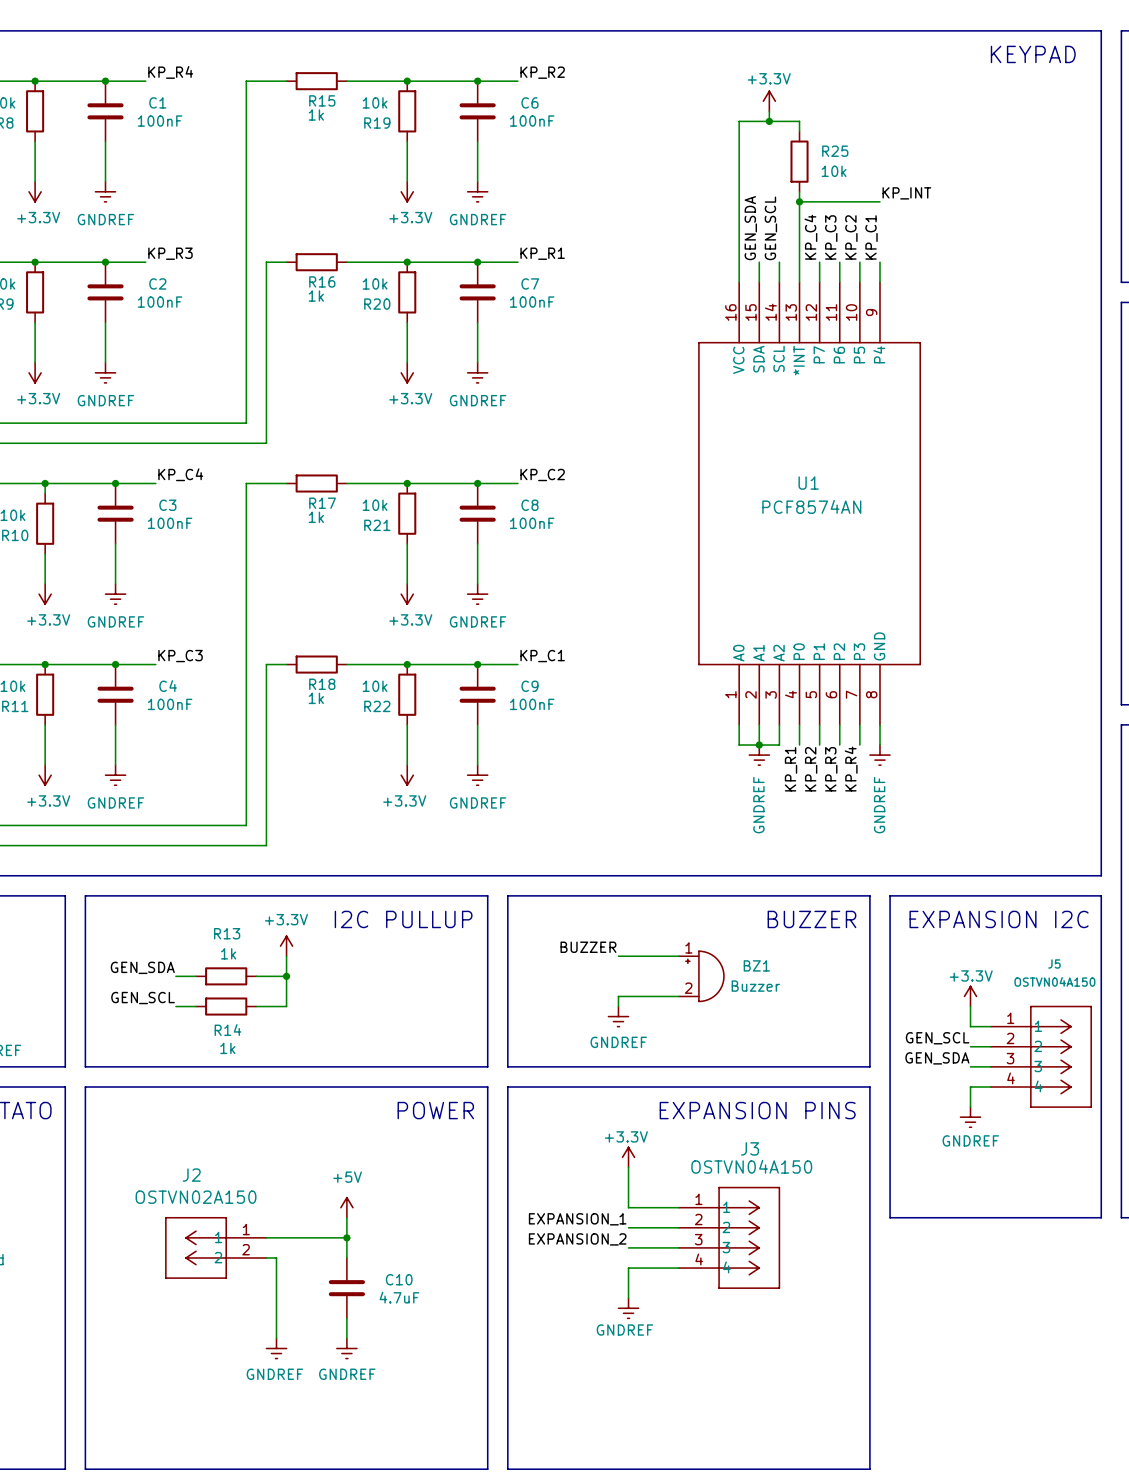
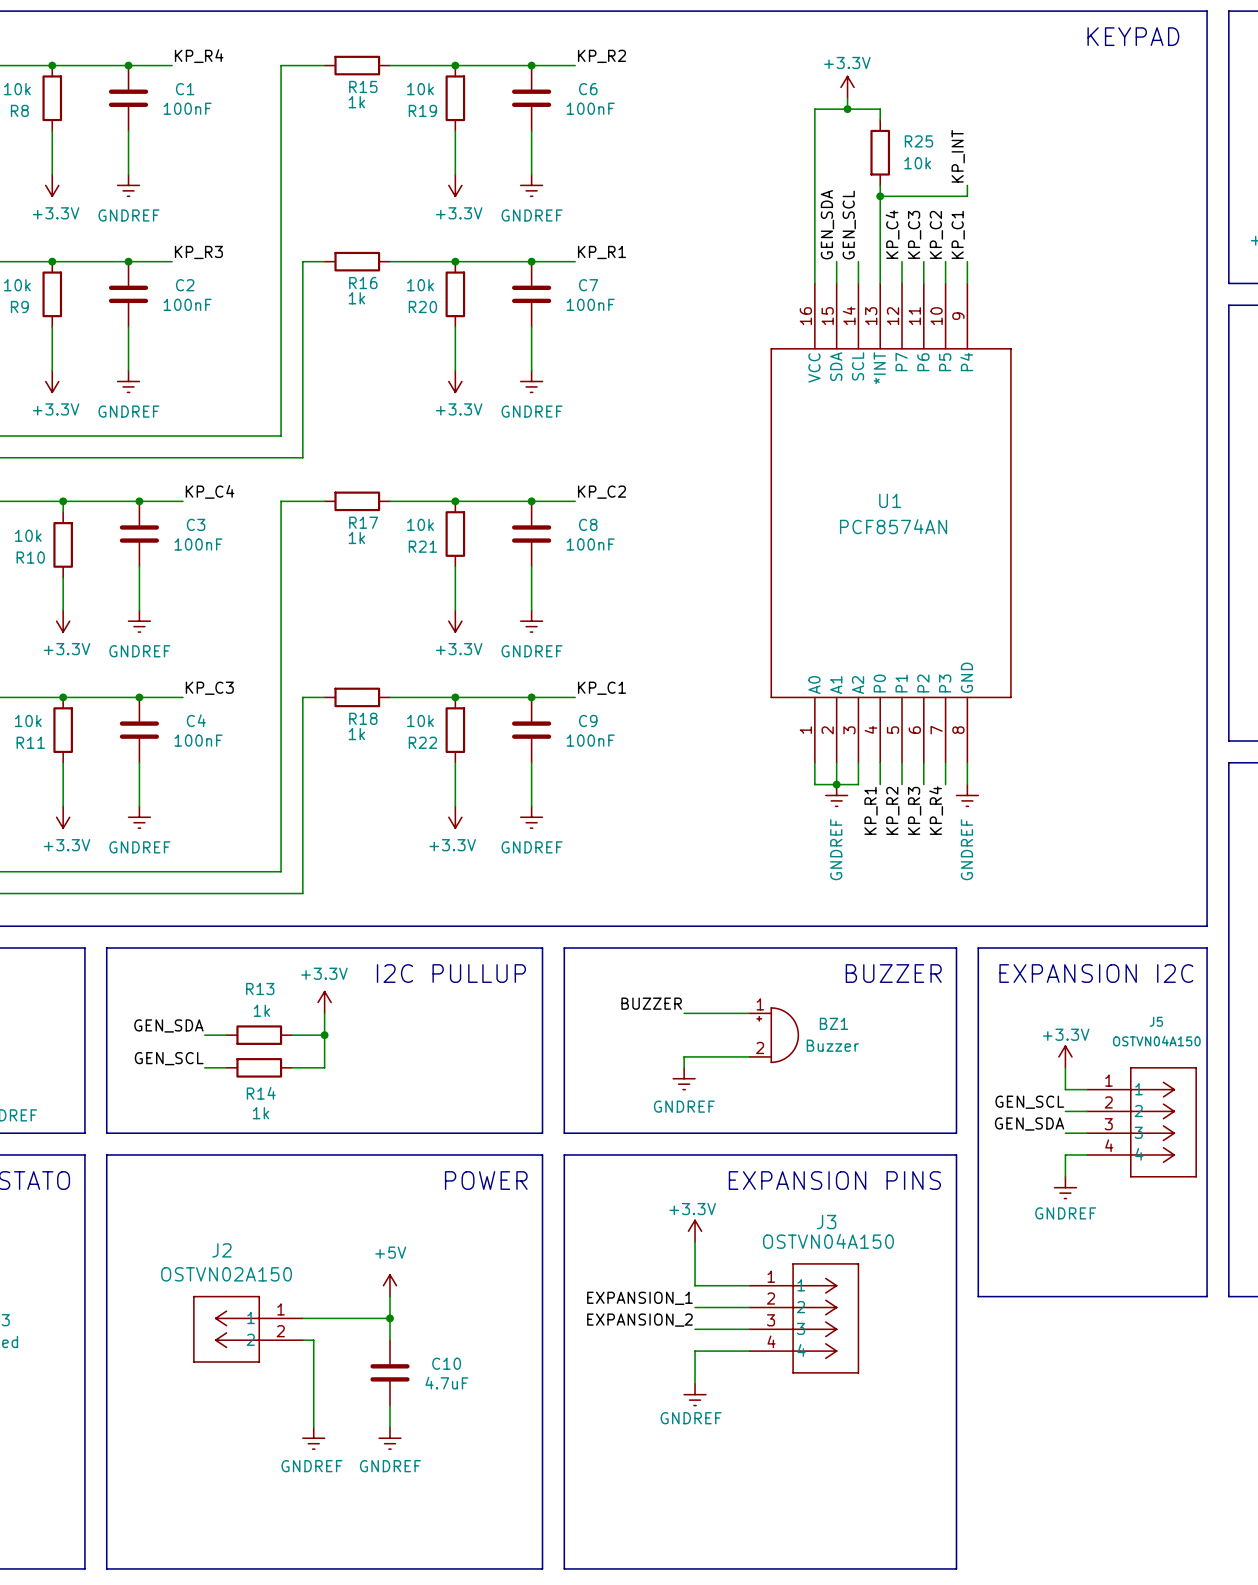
wire: none -> (967, 185) (967, 196)
label rotation: 0° (906, 193) -> 90° counterclockwise (958, 156)

